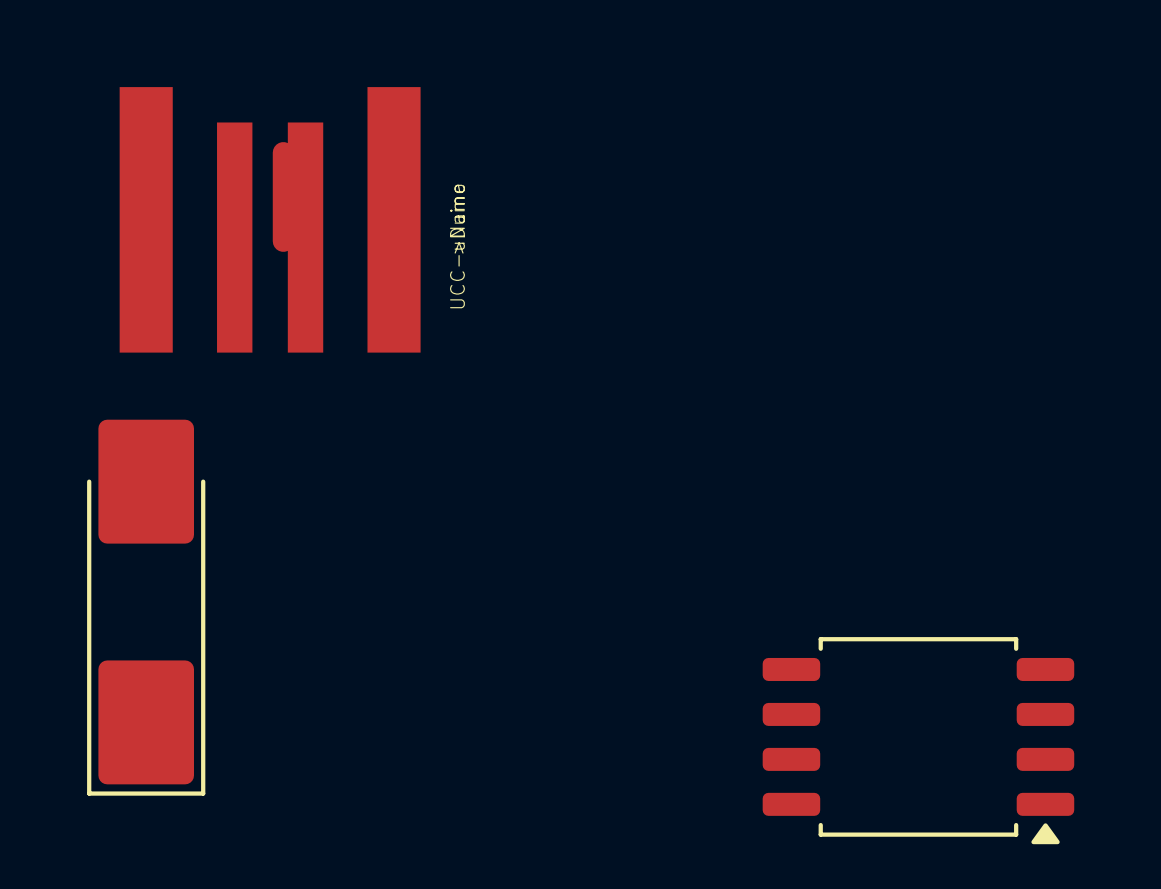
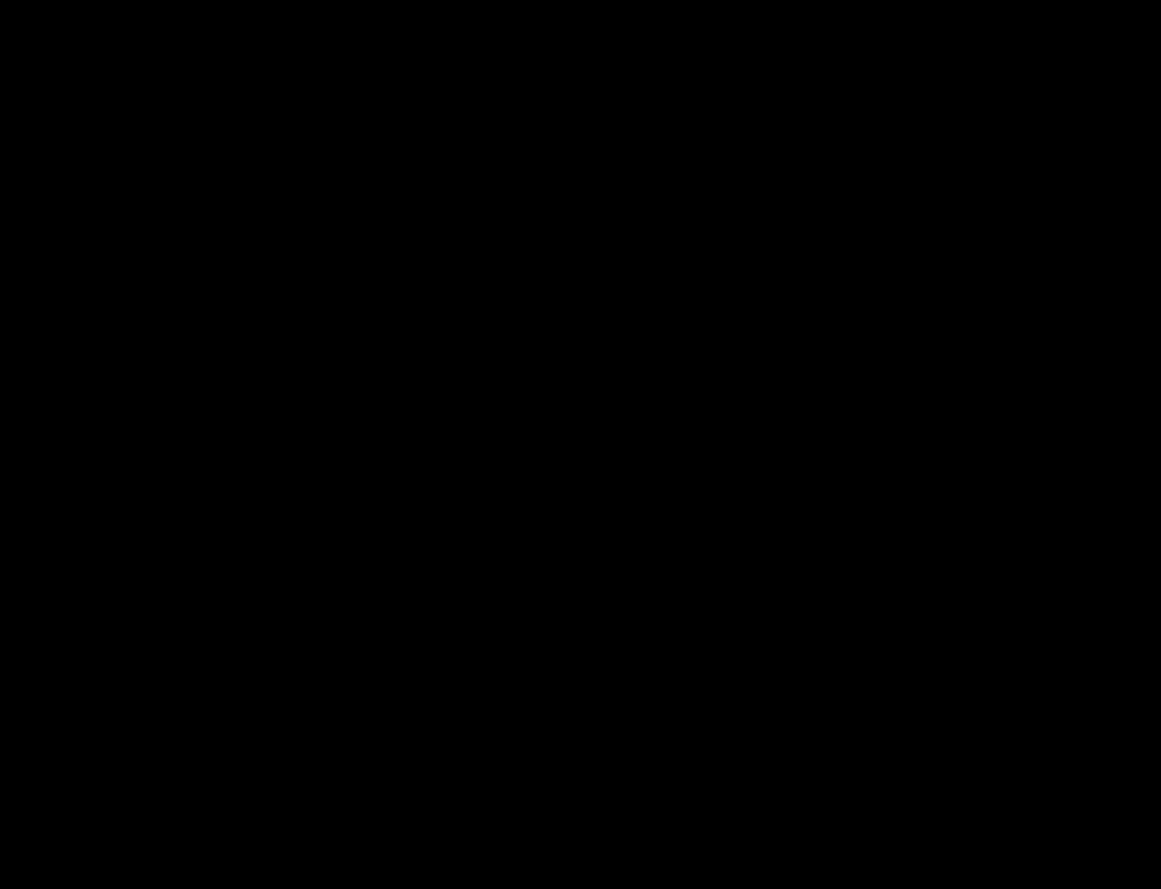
track: (283, 152) (283, 241) -> none
part: (270, 219) -> none
part: (146, 607) -> none
part: (918, 740) -> none

